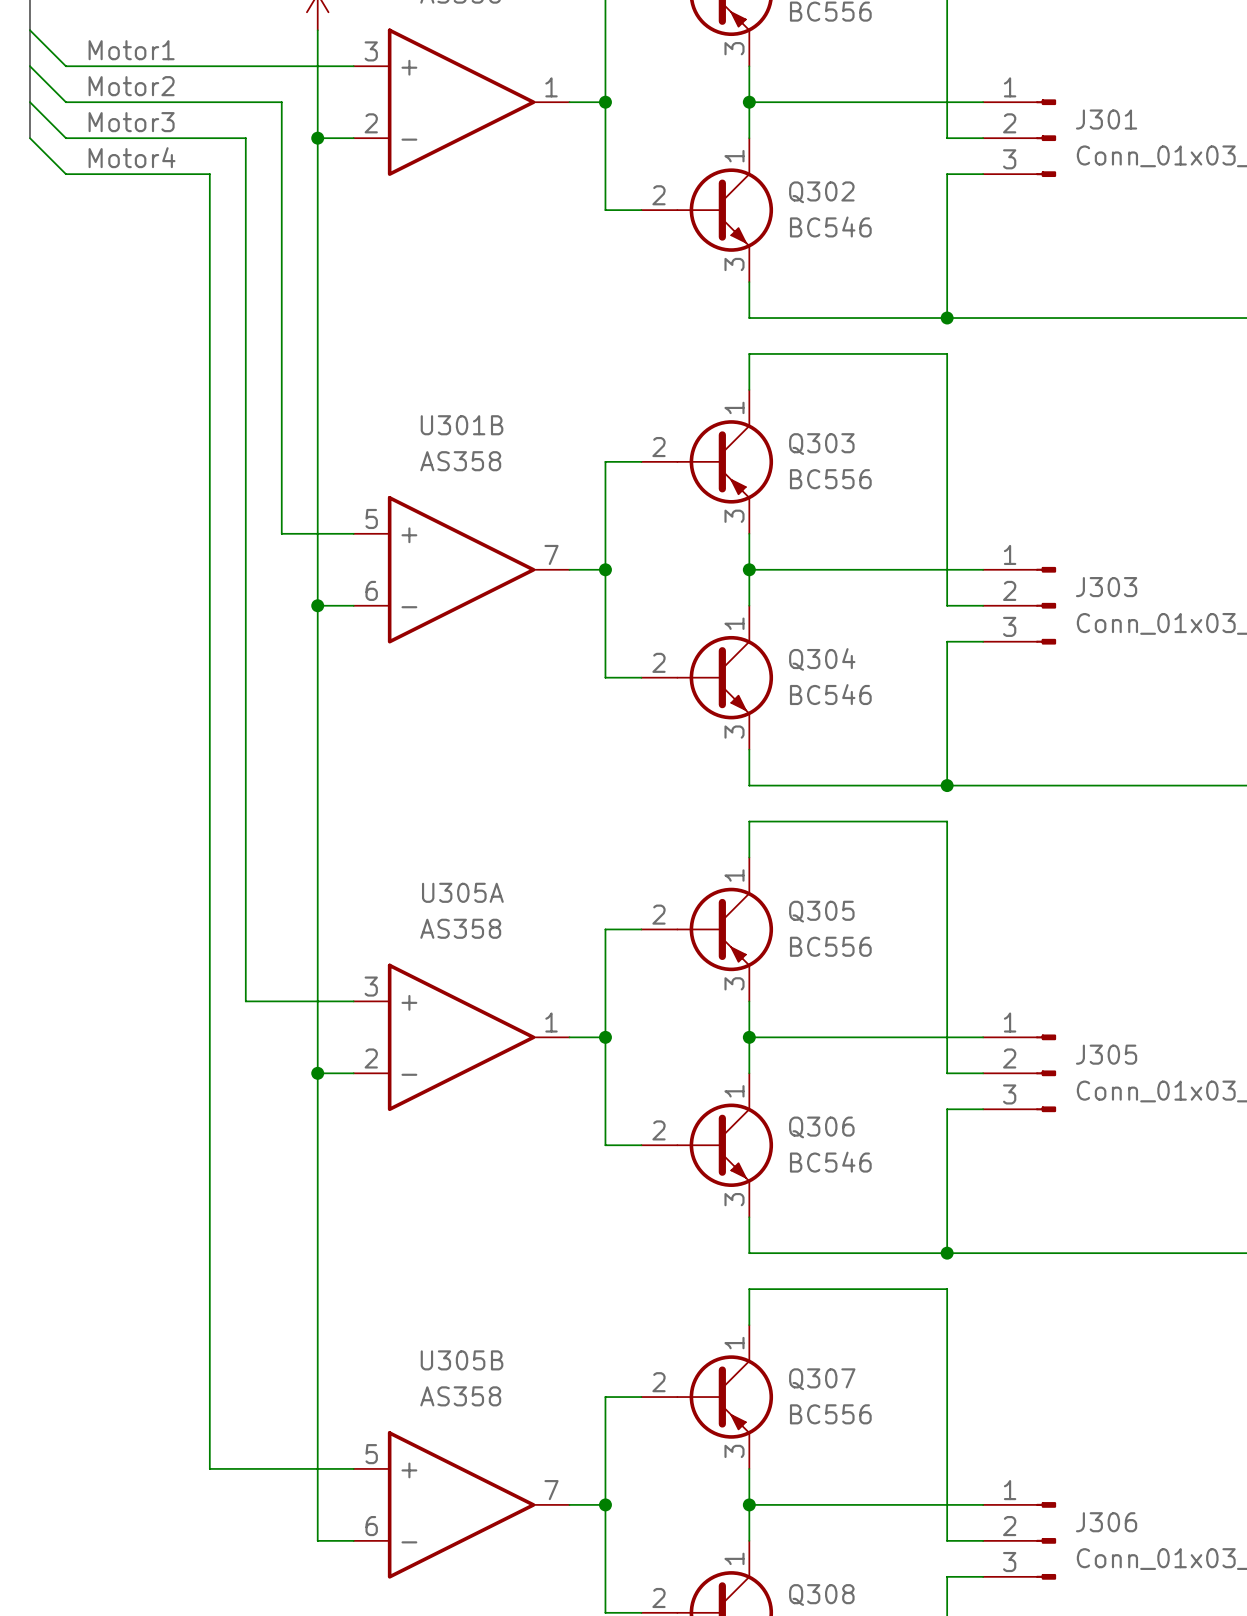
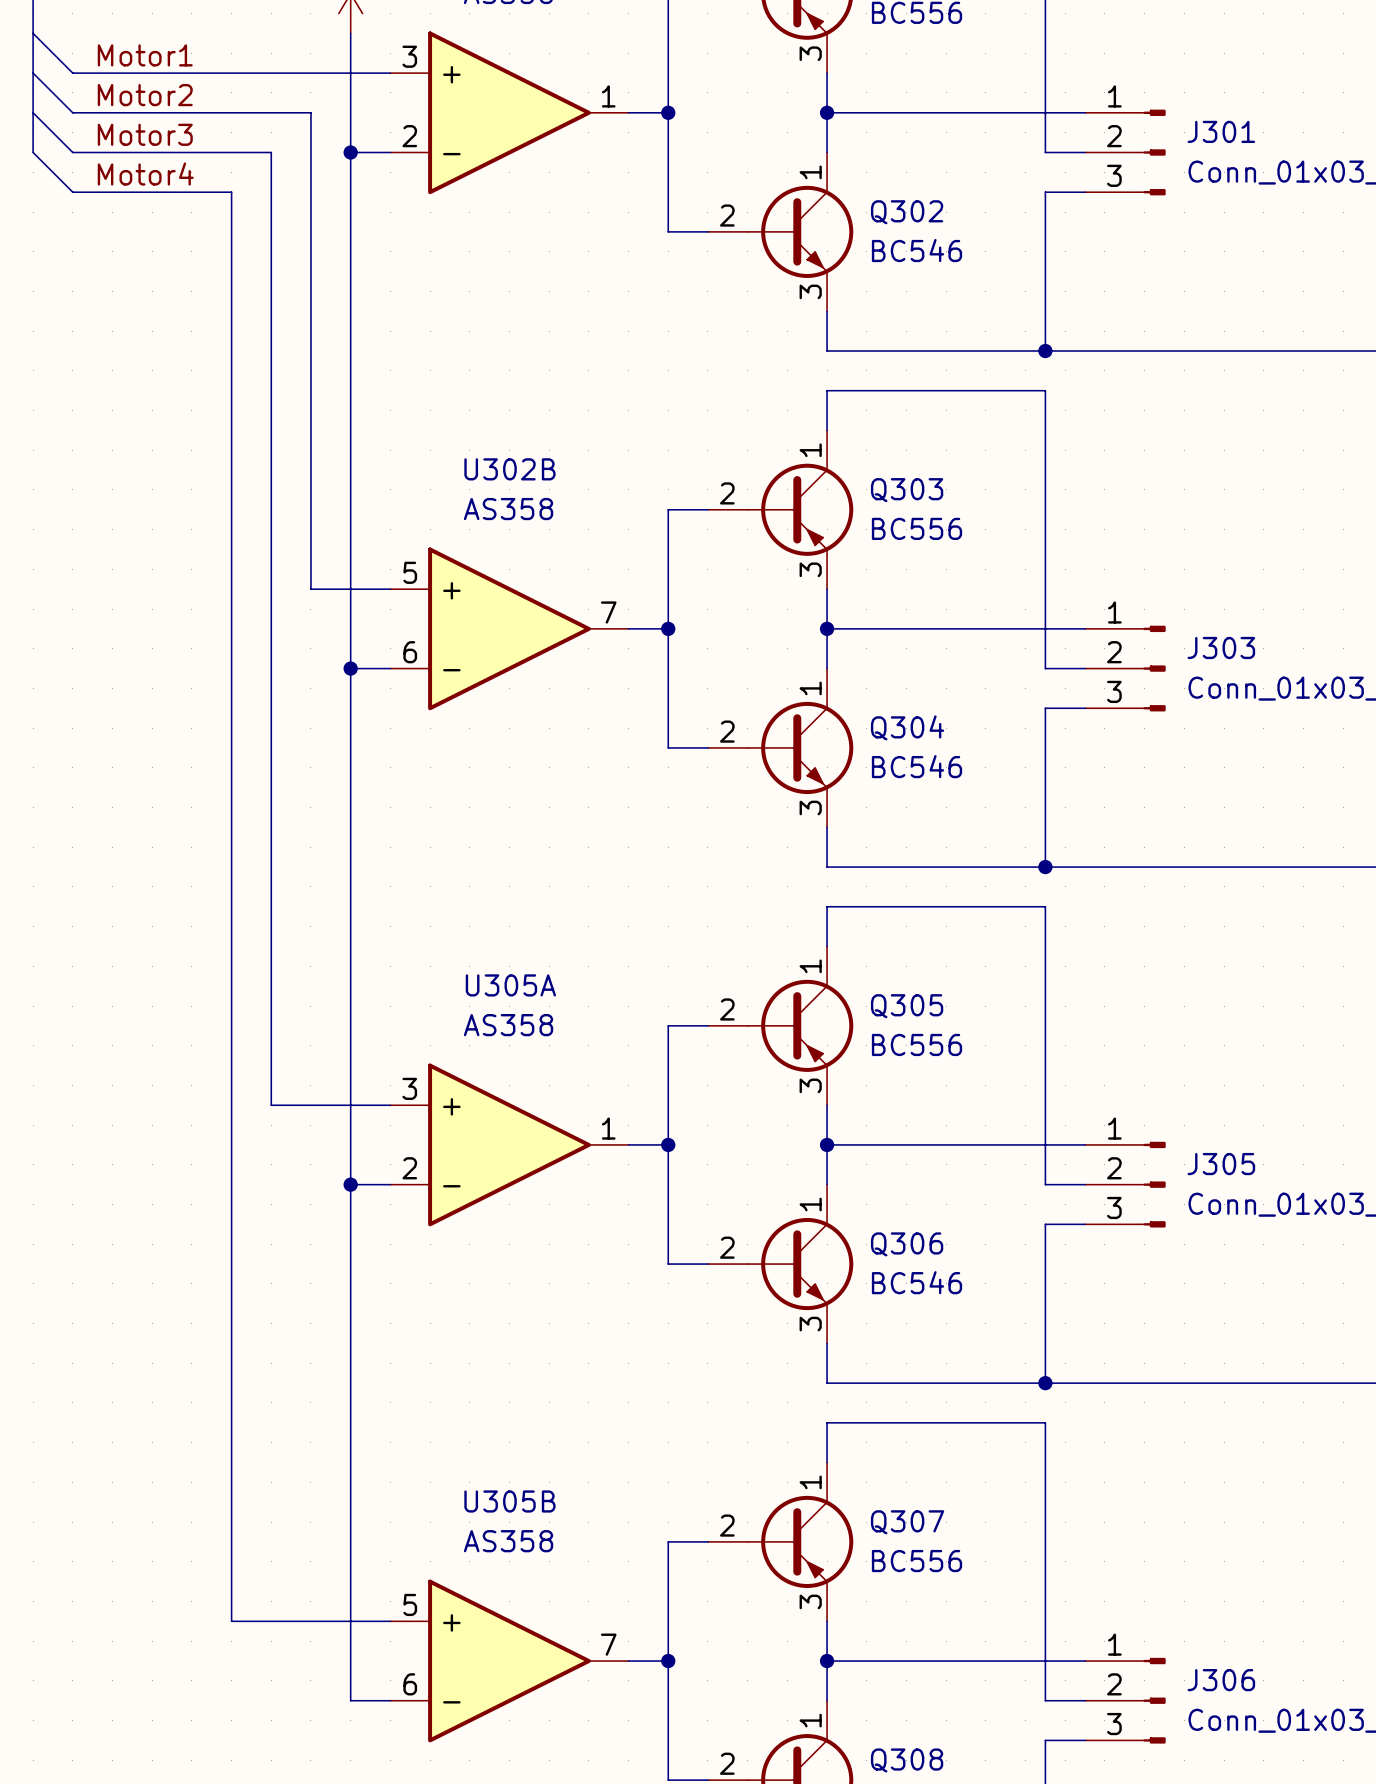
U301B name: U301B (462, 425) -> U302B (509, 469)

